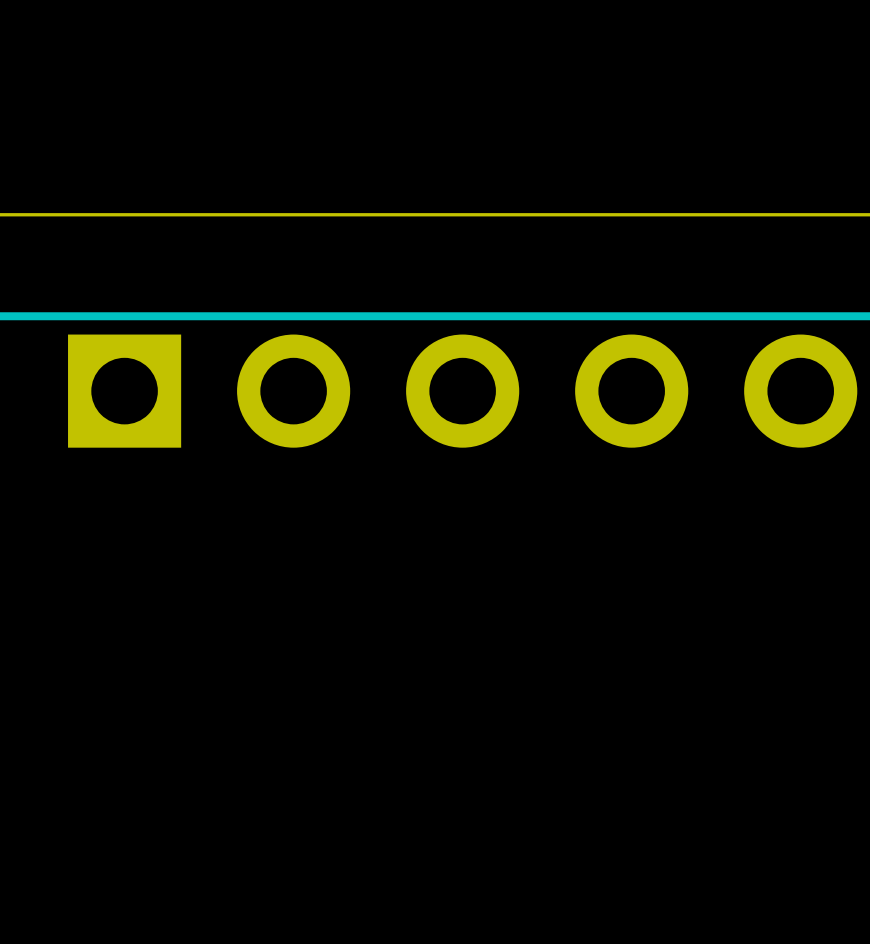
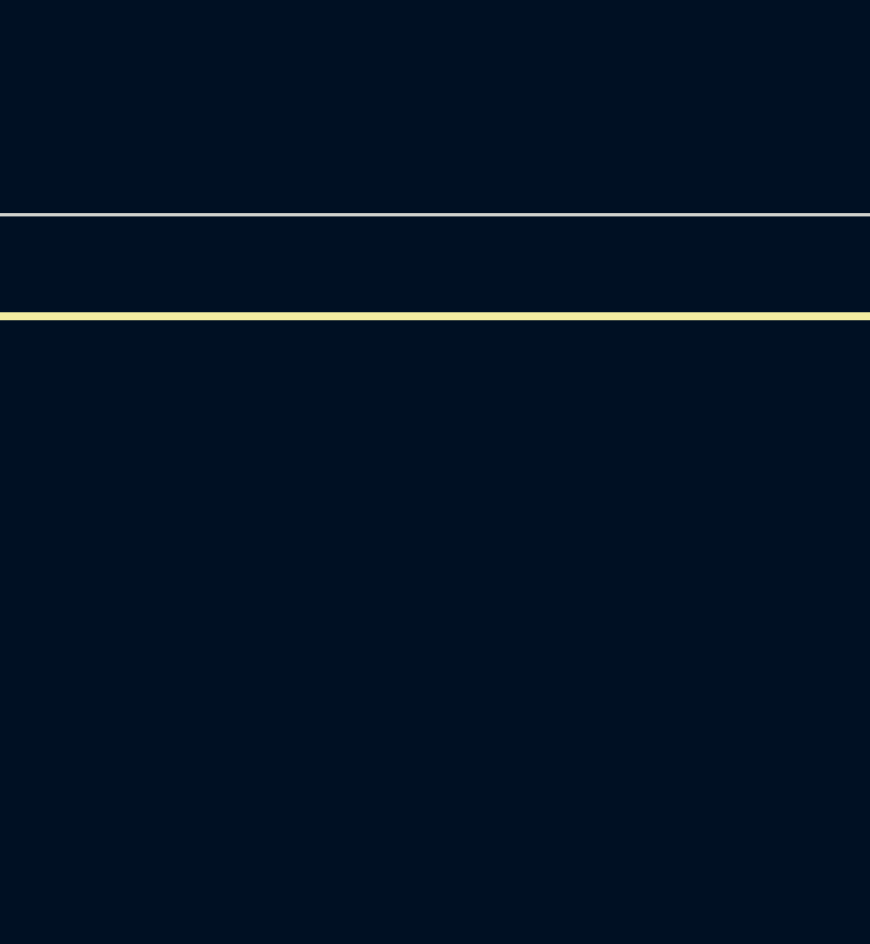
part: (462, 391) -> none

